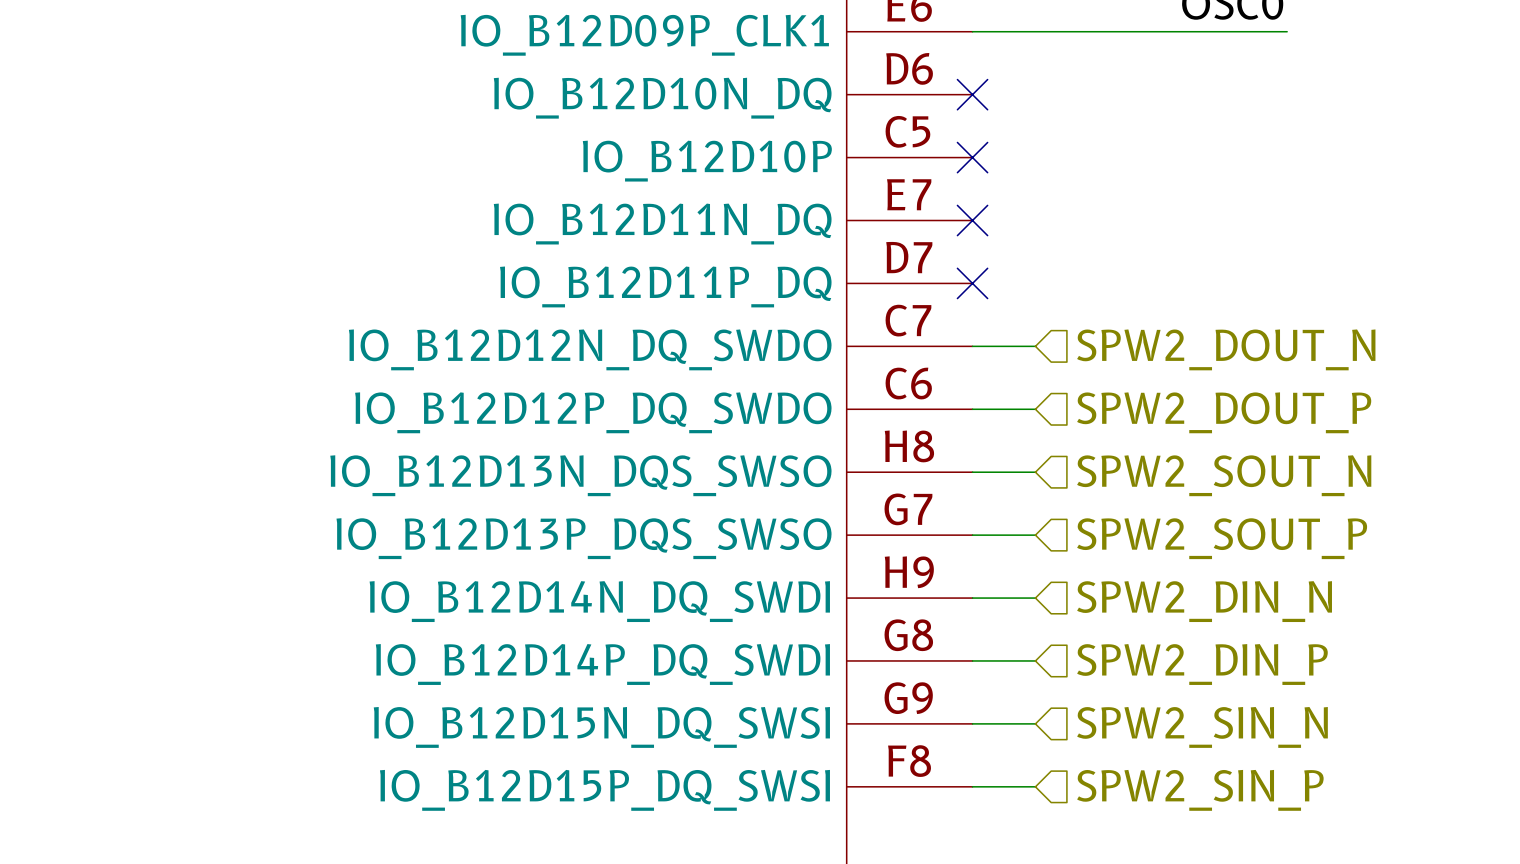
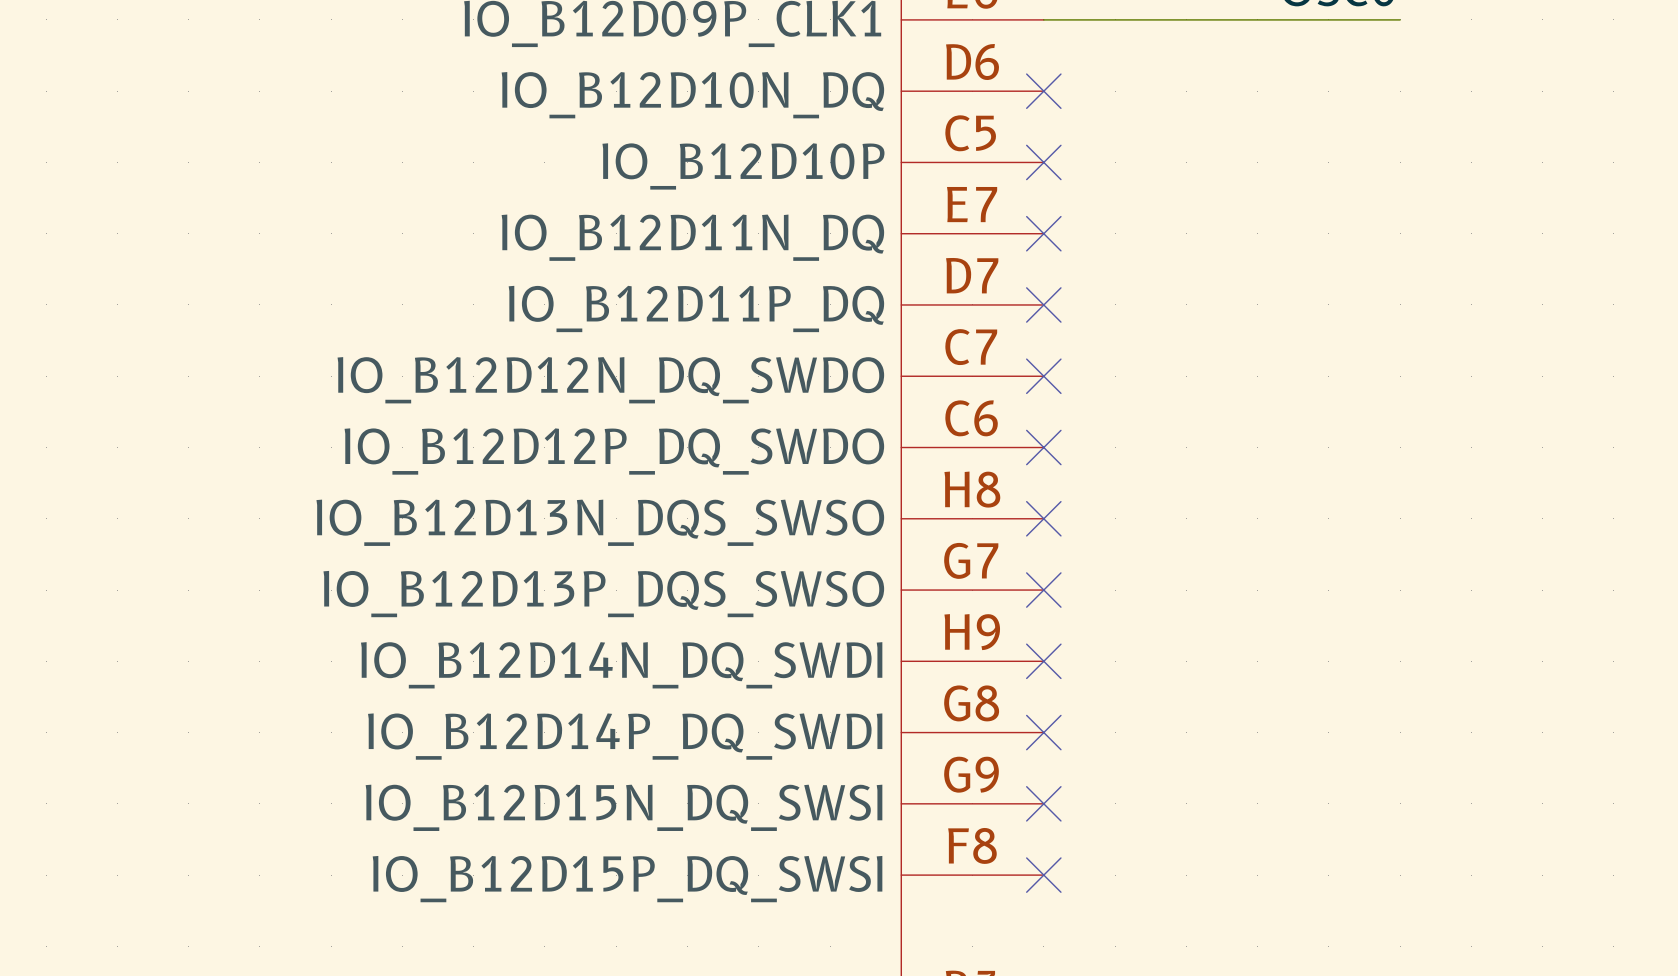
wire: (972, 346) (1035, 346) -> none
no-connect mark: none -> (1043, 376)
hierarchical label: SPW2_DOUT_N (1226, 349) -> none
wire: (972, 409) (1035, 409) -> none
no-connect mark: none -> (1043, 447)
hierarchical label: SPW2_DOUT_P (1224, 412) -> none
wire: (972, 472) (1035, 472) -> none
no-connect mark: none -> (1043, 518)
hierarchical label: SPW2_SOUT_N (1224, 475) -> none
wire: (972, 535) (1035, 535) -> none
no-connect mark: none -> (1043, 590)
hierarchical label: SPW2_SOUT_P (1222, 538) -> none
wire: (972, 598) (1035, 598) -> none
no-connect mark: none -> (1043, 661)
hierarchical label: SPW2_DIN_N (1204, 601) -> none
wire: (972, 660) (1035, 660) -> none
no-connect mark: none -> (1043, 732)
hierarchical label: SPW2_DIN_P (1202, 664) -> none
wire: (972, 723) (1035, 723) -> none
no-connect mark: none -> (1043, 803)
hierarchical label: SPW2_SIN_N (1202, 727) -> none
wire: (972, 786) (1035, 786) -> none
no-connect mark: none -> (1043, 875)
hierarchical label: SPW2_SIN_P (1200, 790) -> none

